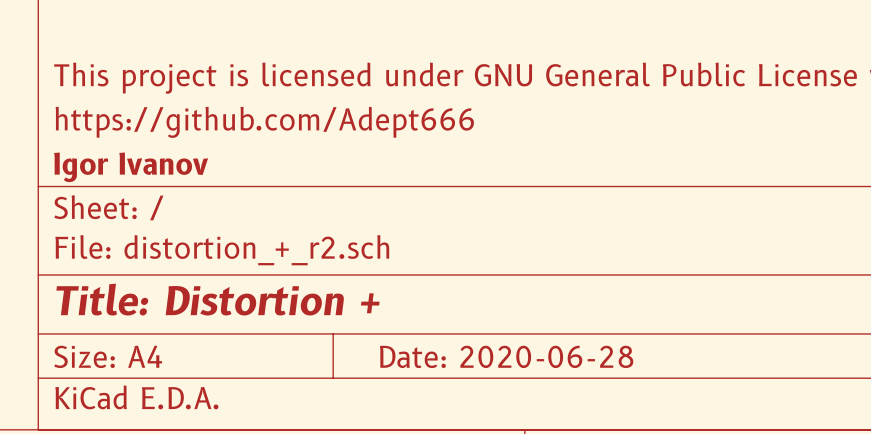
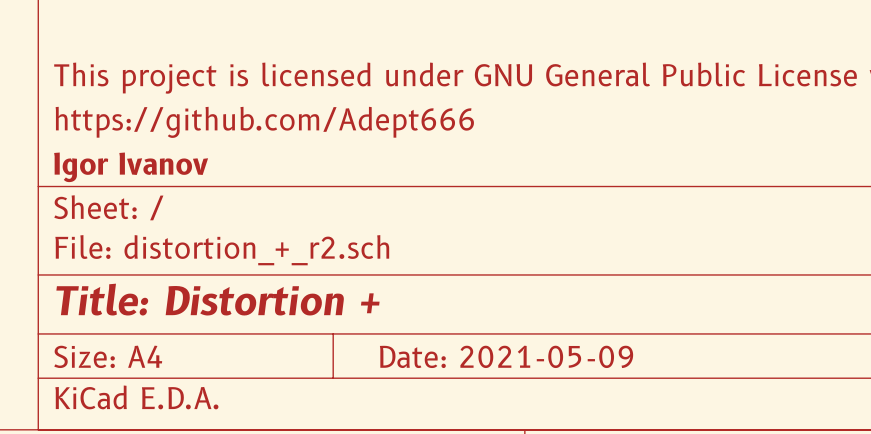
title block: Date: 2020-06-28 (506, 356) -> Date: 2021-05-09 (506, 356)

